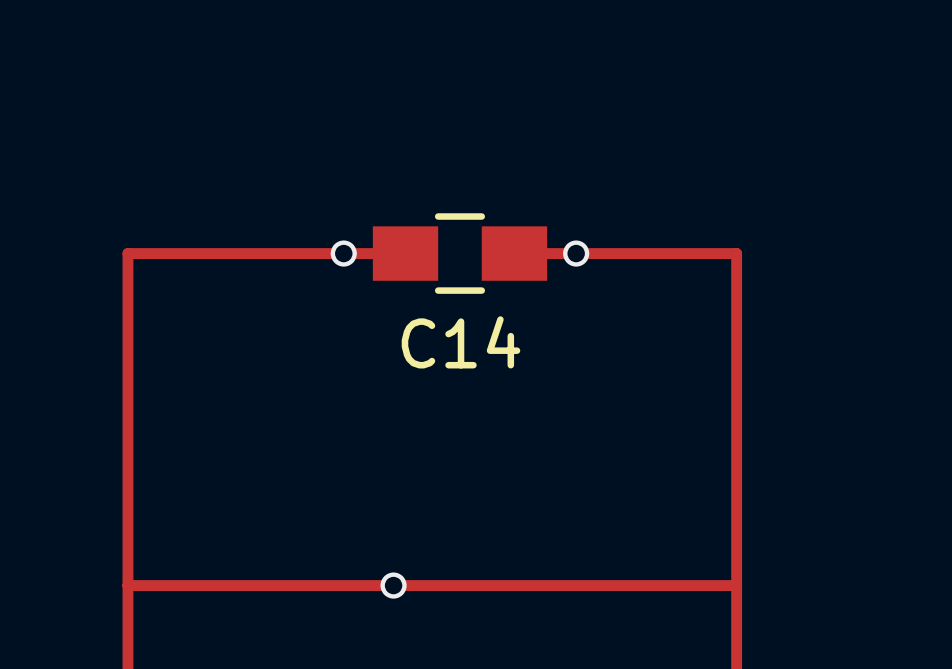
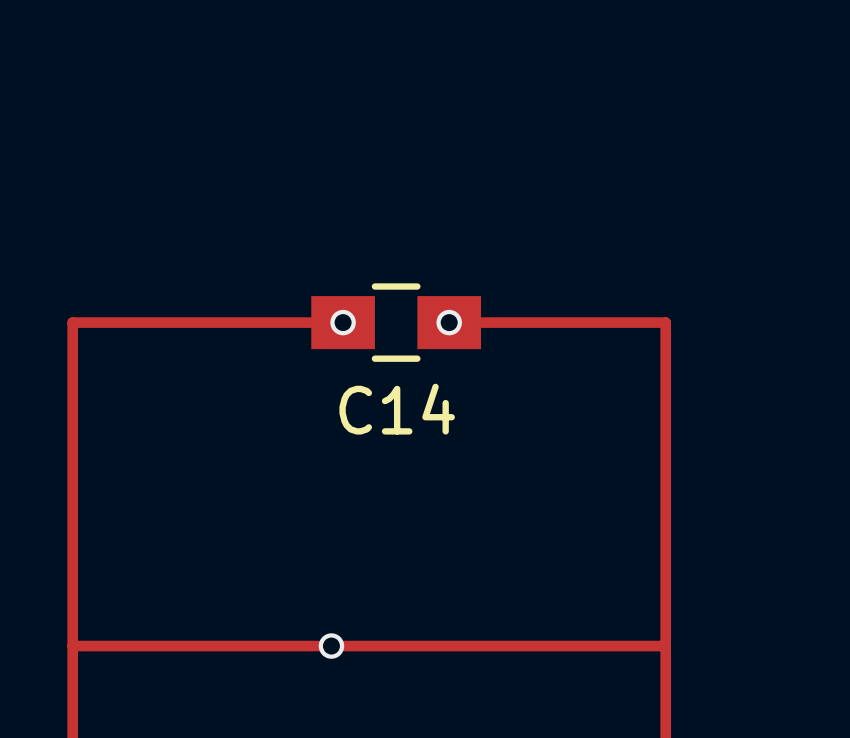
via position: (343, 253) -> (343, 322)
via position: (576, 253) -> (449, 322)

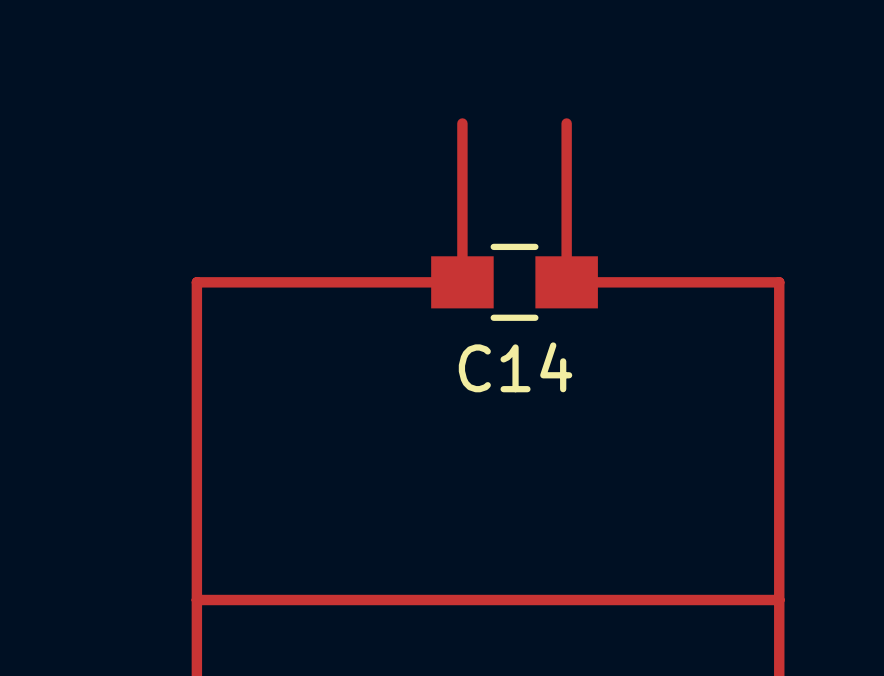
track: none -> (462, 123) (462, 282)
track: none -> (566, 123) (566, 282)
via: (343, 322) -> none
via: (449, 322) -> none
via: (331, 646) -> none

